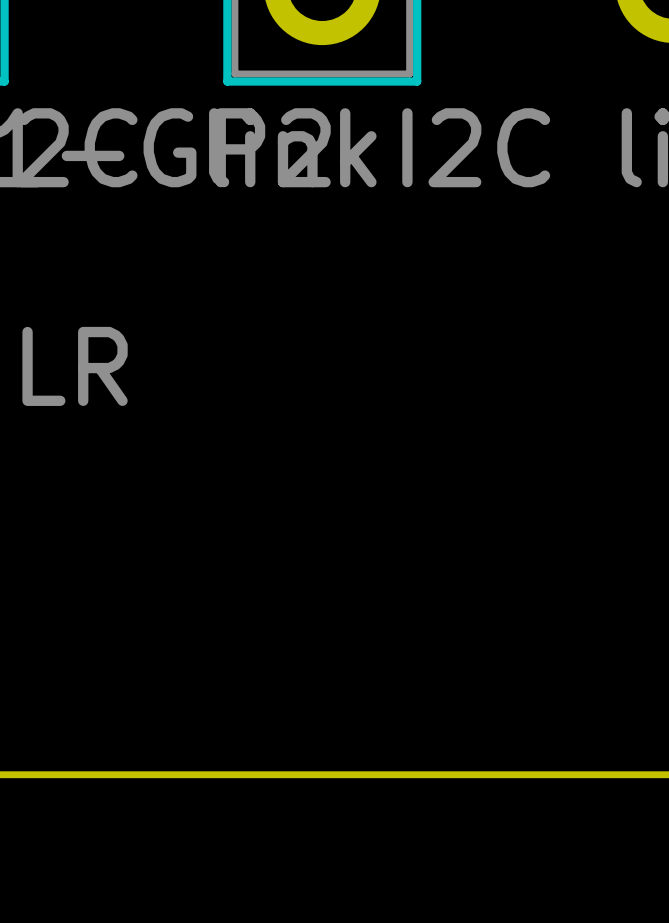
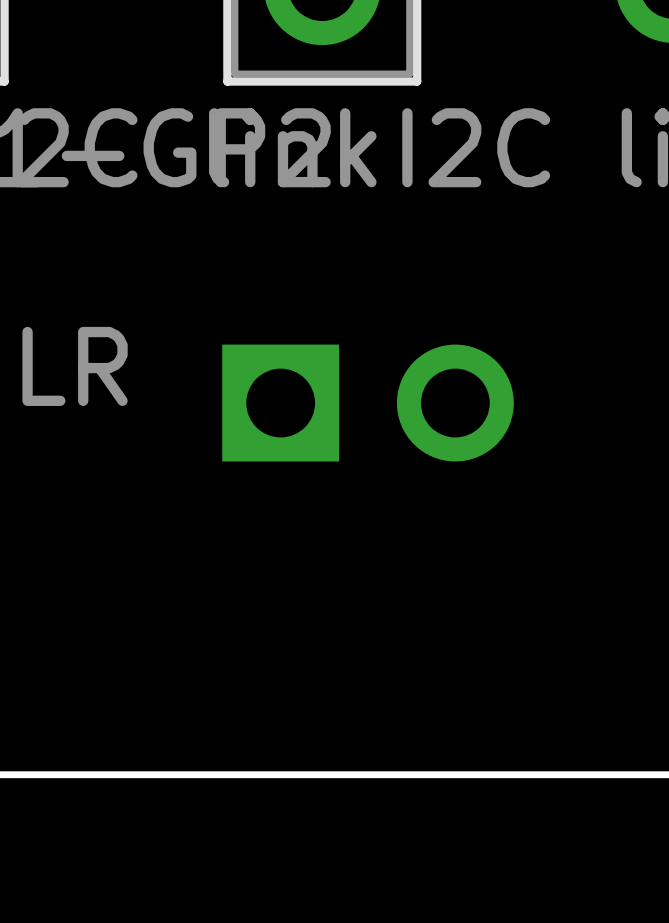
part: none -> (368, 403)

